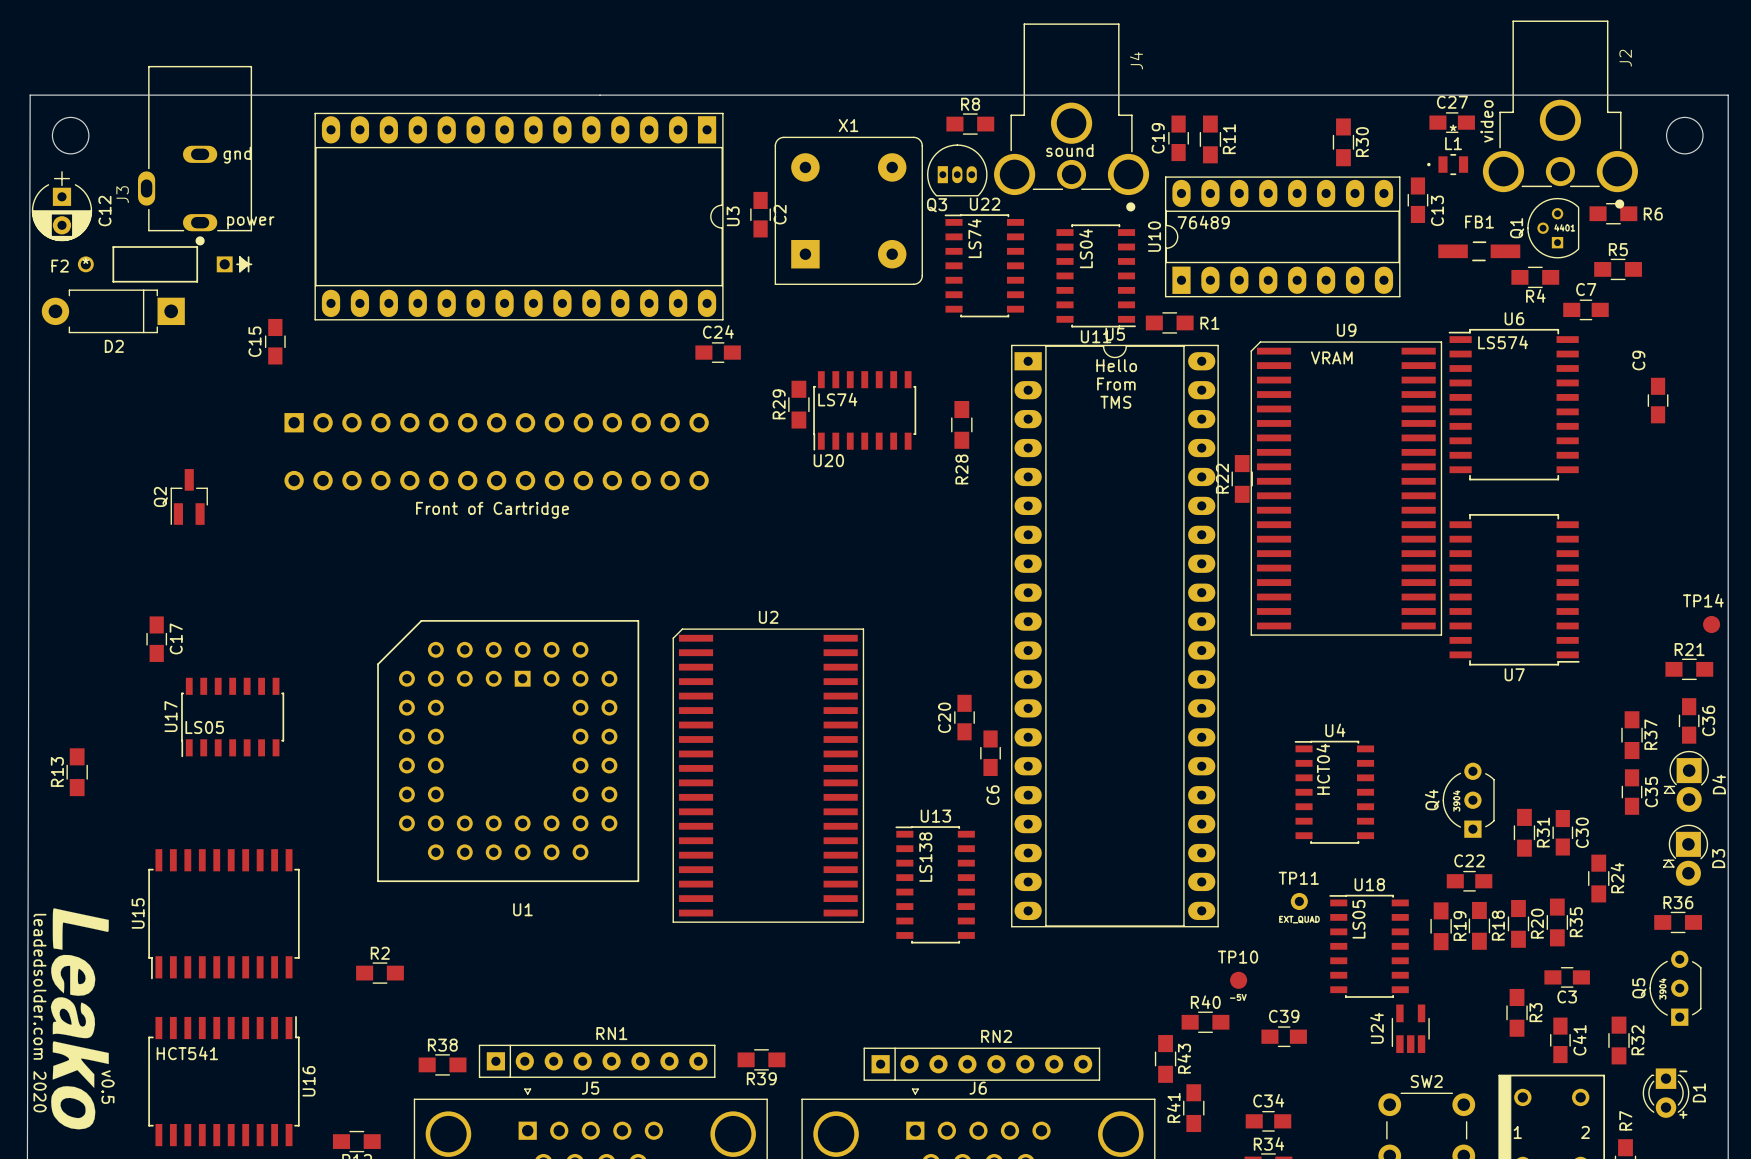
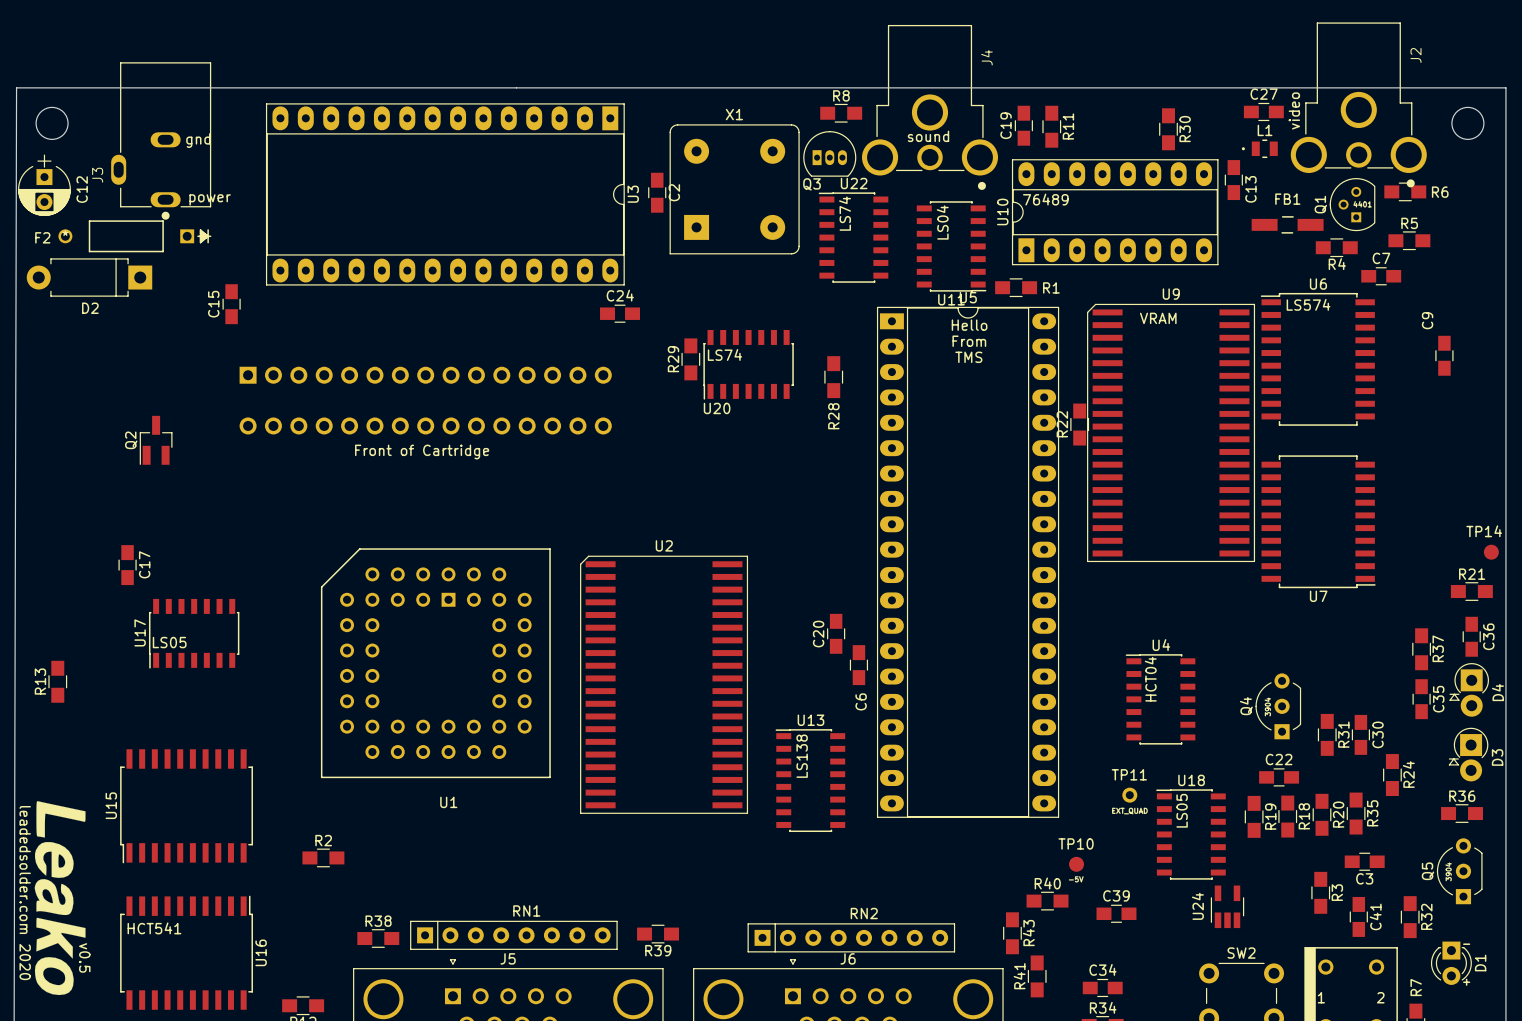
L1 text: * (1453, 127) -> none

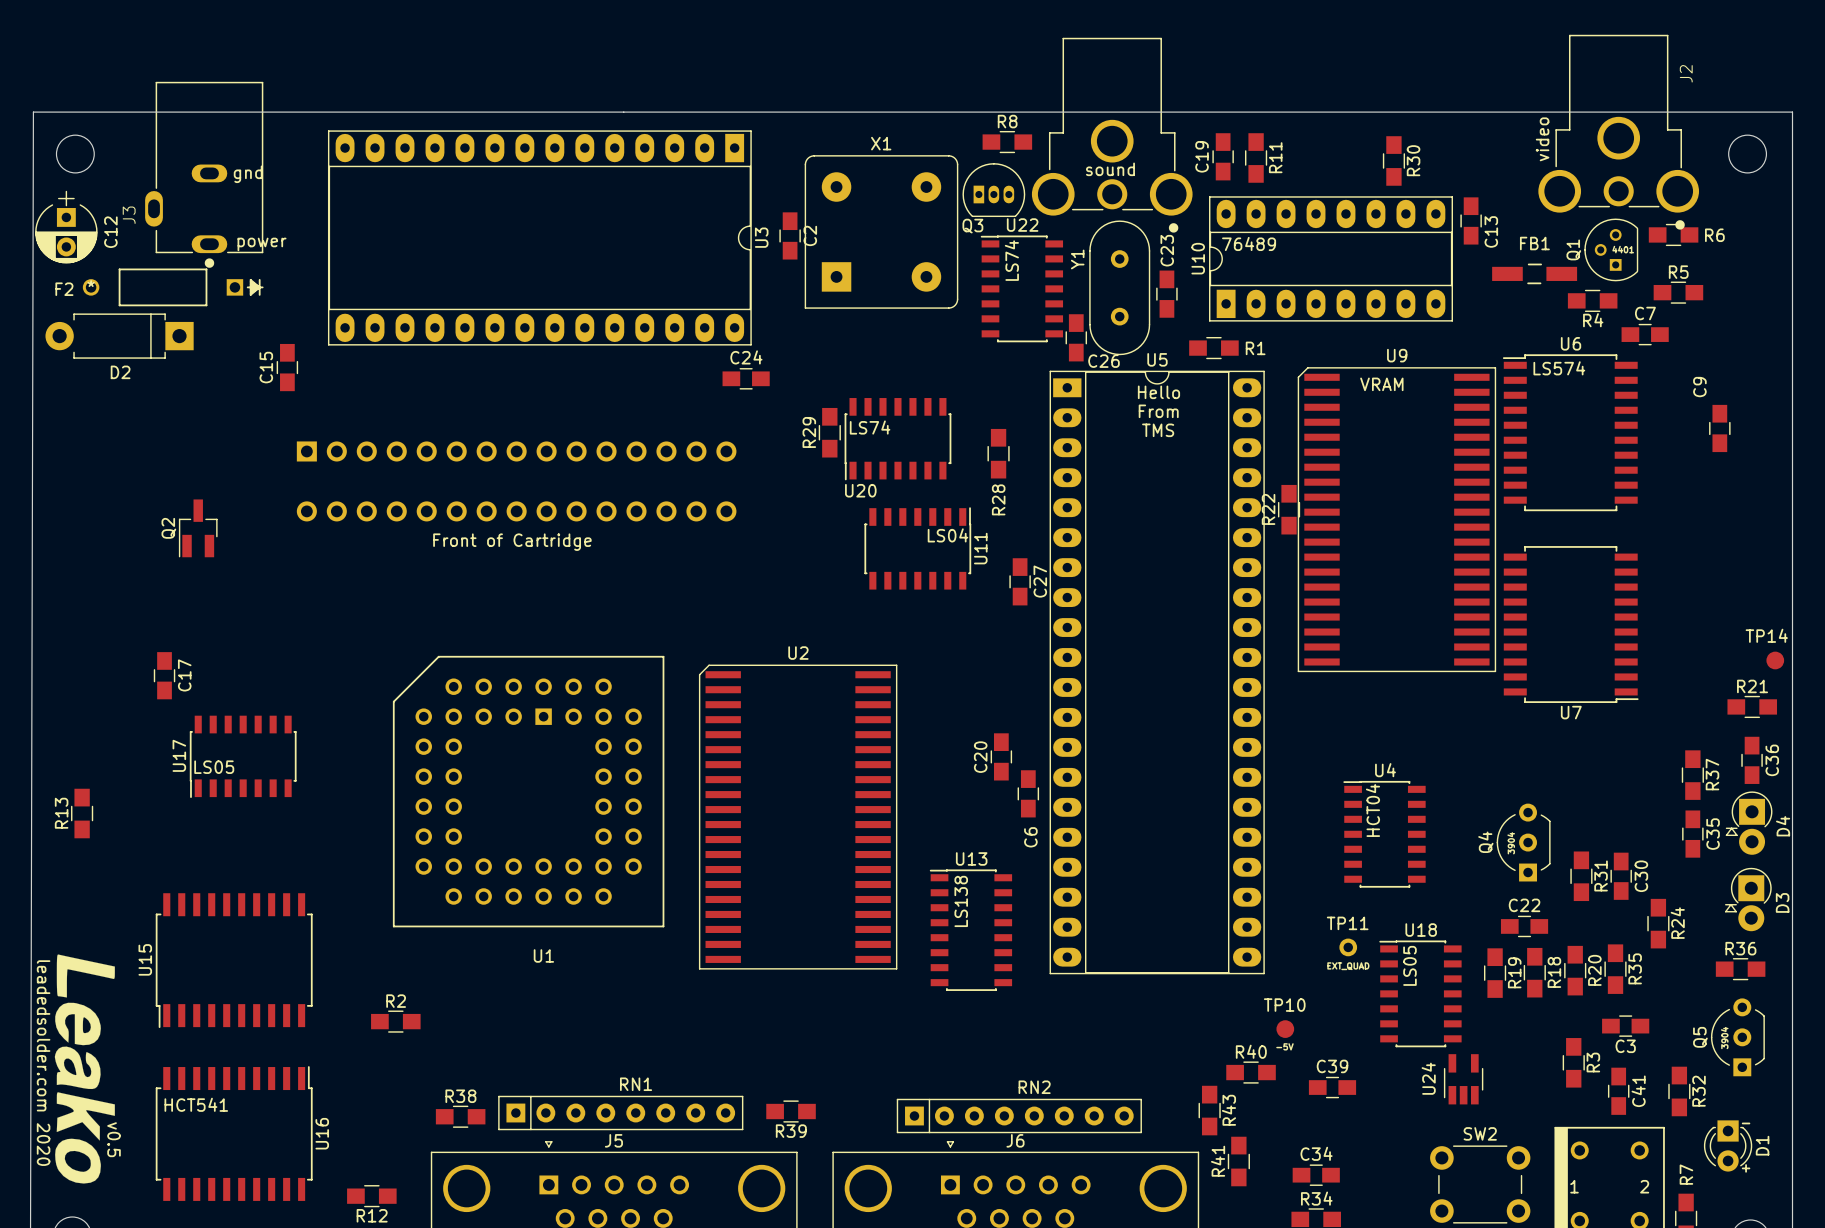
J4 name: J4 (986, 57) -> none
C27 rotation: 0° (1263, 111) -> 90° clockwise (1020, 581)
C27 position: (1263, 111) -> (1020, 581)
L1: (1259, 148) -> none
text: LS04 (942, 222) -> none
Y1: none -> (1119, 287)
C23: none -> (1166, 294)
U11 rotation: 0° (951, 246) -> 90° counterclockwise (917, 548)
U11 position: (951, 246) -> (917, 548)
C26: none -> (1076, 337)
text: none -> LS04 (947, 535)

